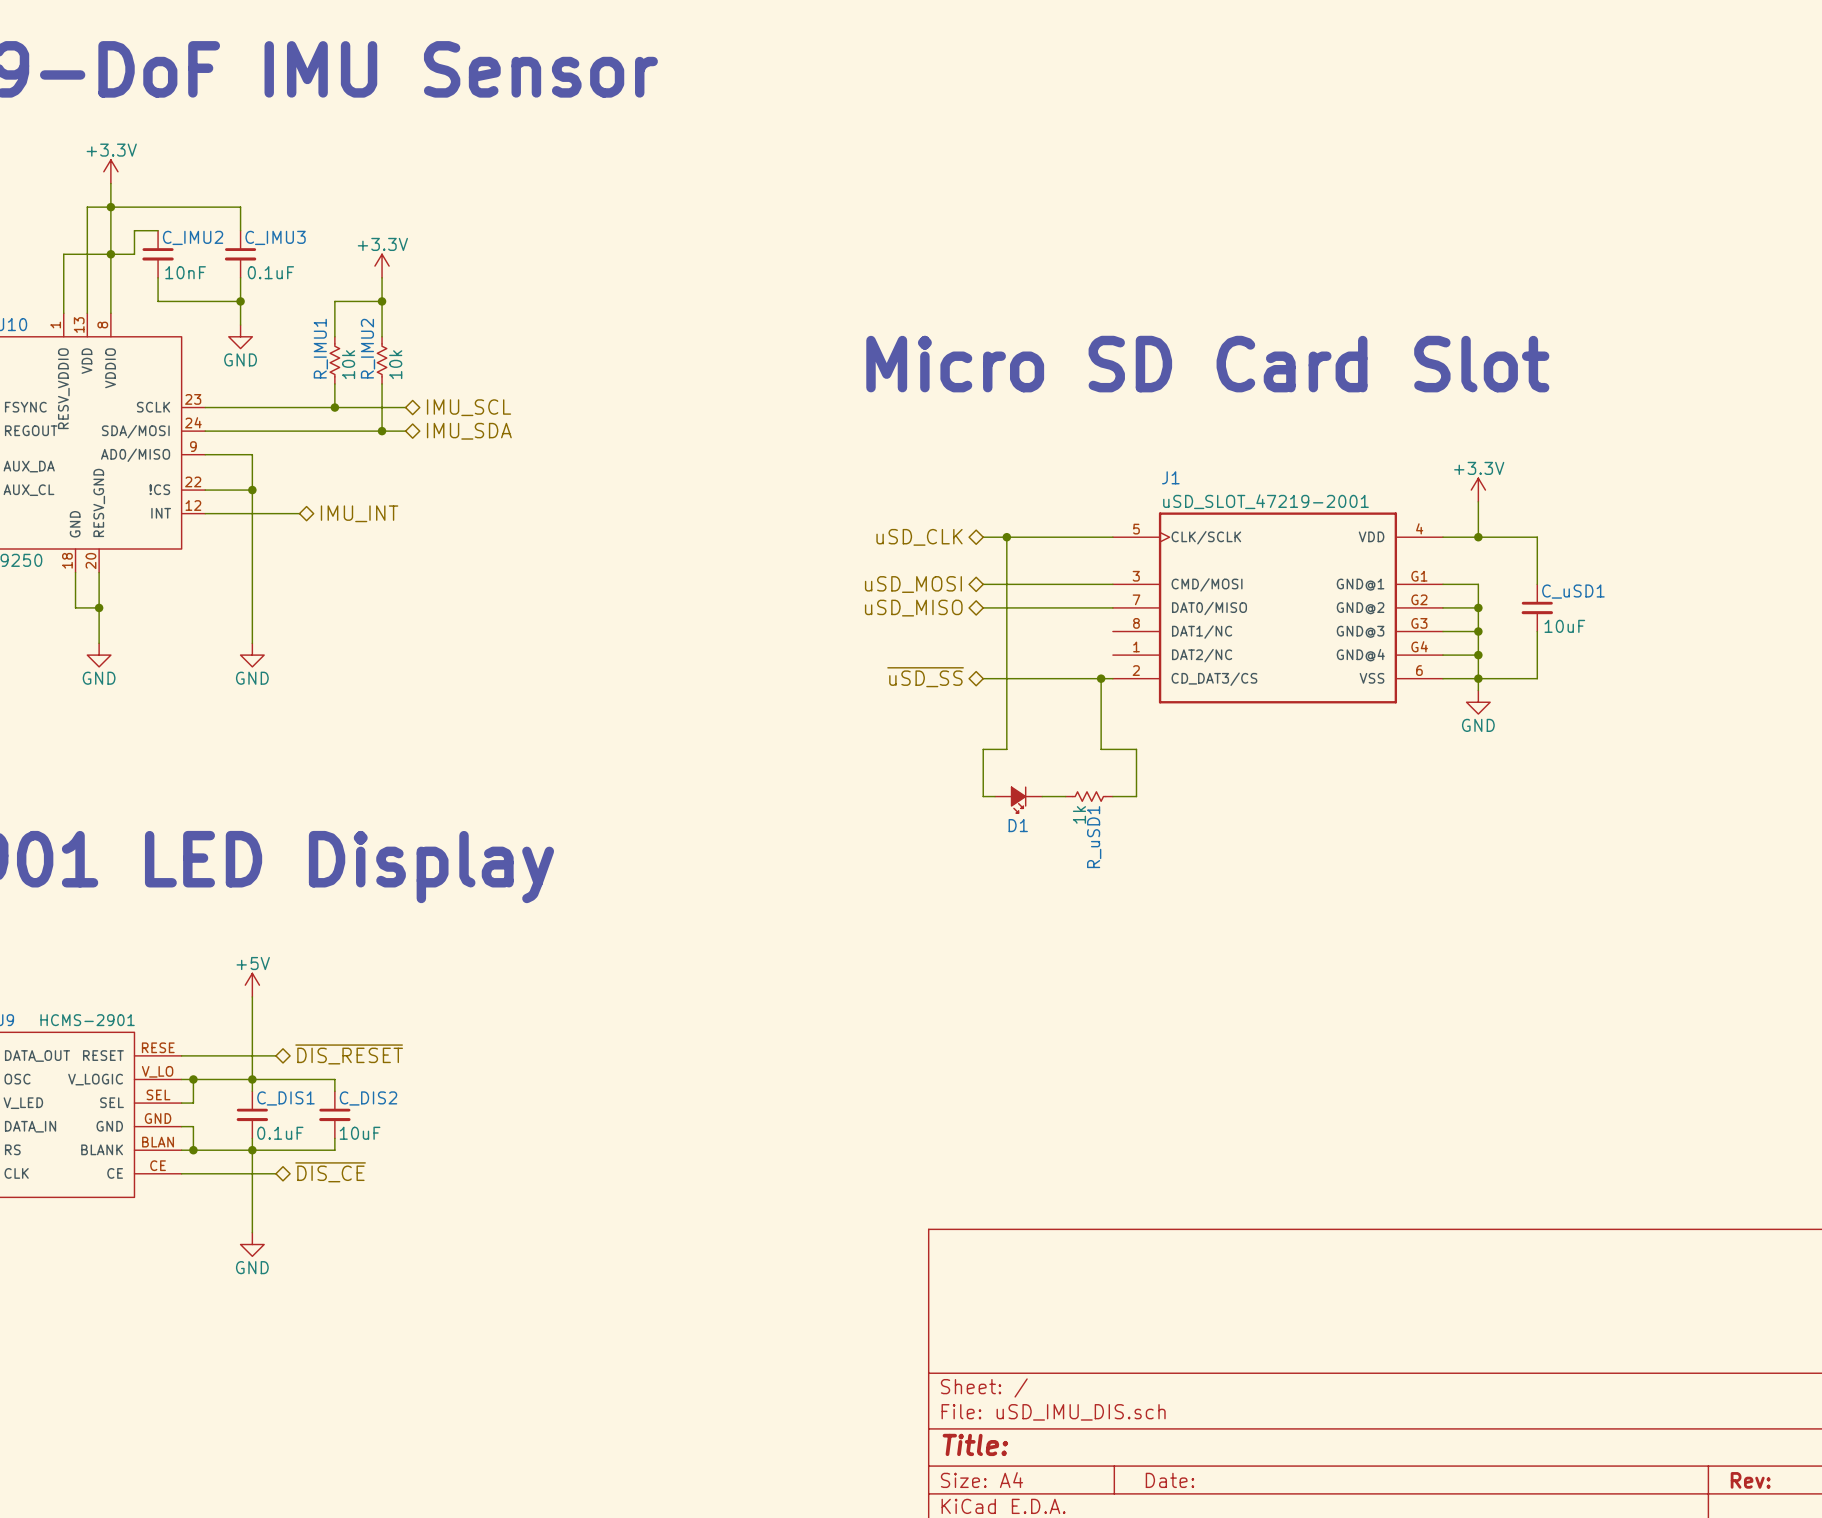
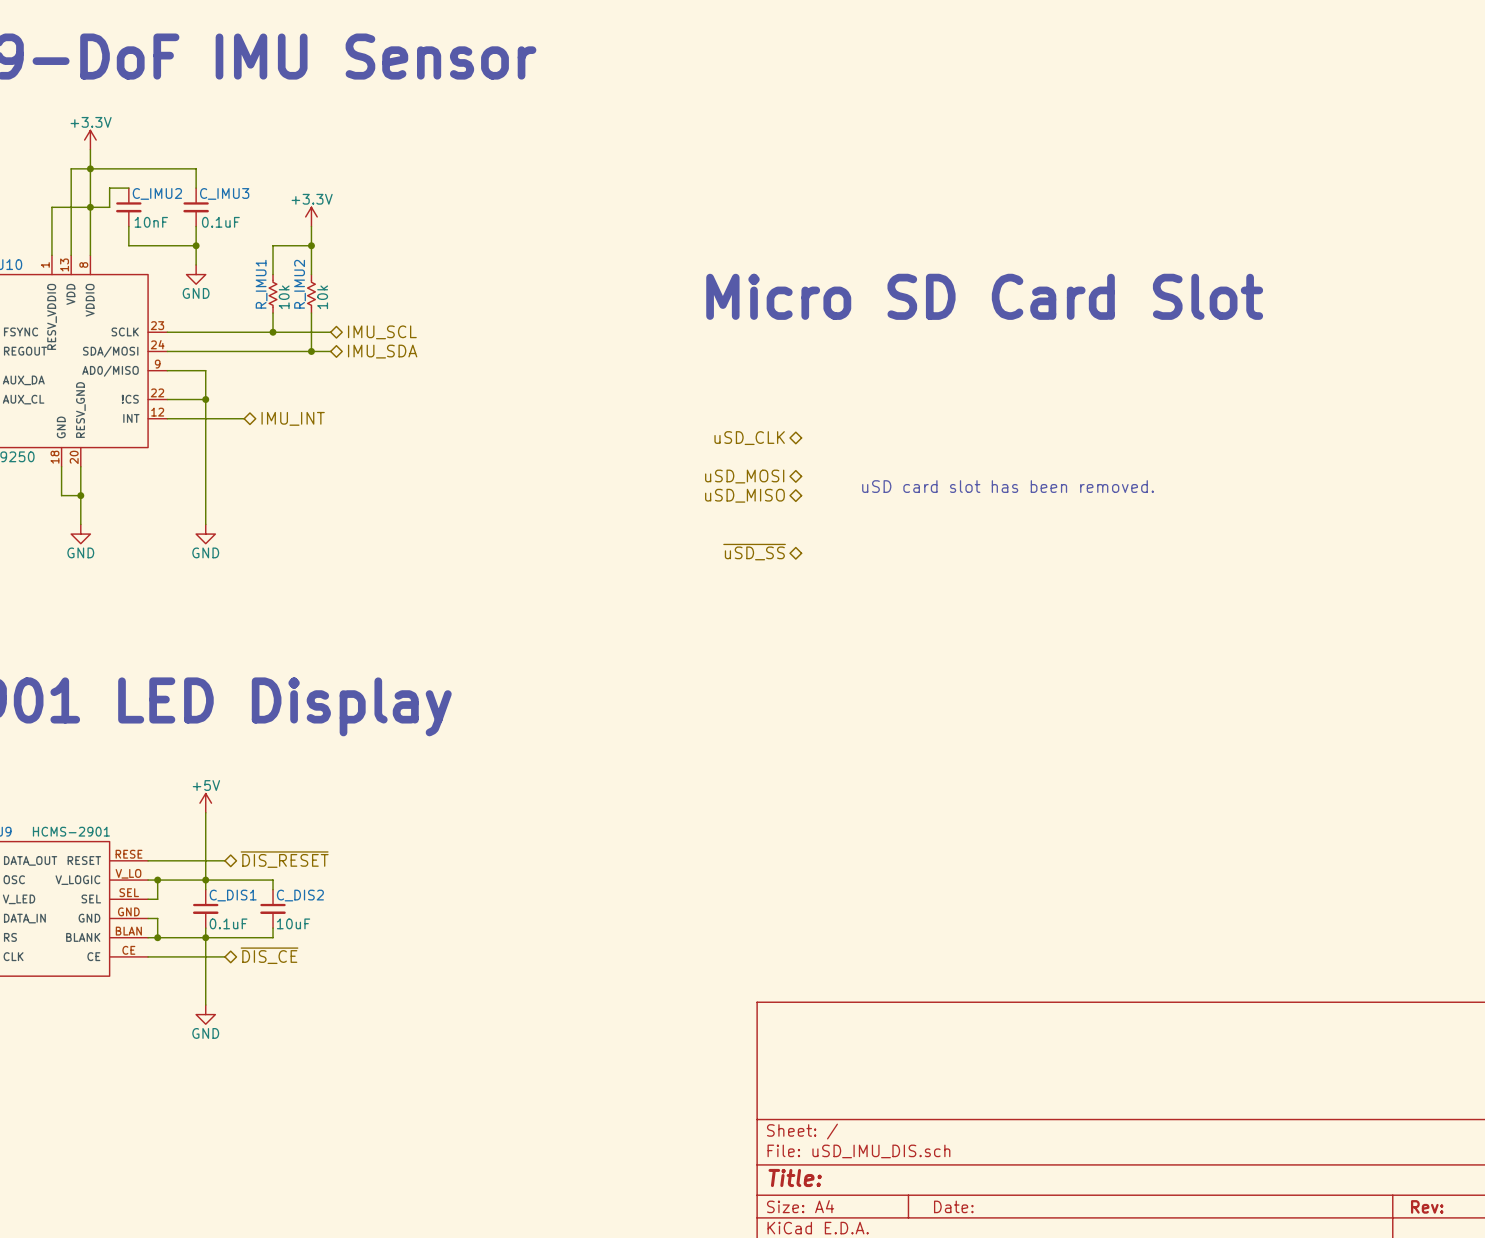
power symbol: +3.3V (1478, 490) -> none
wire: (1478, 501) (1478, 537) -> none
wire: (983, 537) (1112, 537) -> none
wire: (1006, 537) (1006, 749) (983, 749) (983, 796) (995, 796) -> none
junction: (1006, 537) -> none
wire: (1442, 537) (1537, 537) (1537, 584) -> none
junction: (1478, 537) -> none
wire: (983, 584) (1112, 584) -> none
wire: (1442, 584) (1478, 584) (1478, 690) -> none
text: none -> uSD card slot has been removed. (1008, 486)
wire: (983, 607) (1112, 607) -> none
J1: uSD_SLOT_47219-2001 (1277, 607) -> none
wire: (1442, 607) (1478, 607) -> none
junction: (1478, 607) -> none
C_uSD1: 10uF (1537, 607) -> none
wire: (1442, 631) (1478, 631) -> none
junction: (1478, 631) -> none
wire: (1537, 631) (1537, 678) (1442, 678) -> none
wire: (1442, 655) (1478, 655) -> none
junction: (1478, 655) -> none
wire: (983, 678) (1112, 678) -> none
wire: (1101, 678) (1101, 749) (1136, 749) (1136, 796) (1112, 796) -> none
junction: (1101, 678) -> none
junction: (1478, 678) -> none
power symbol: GND (1478, 702) -> none
wire: (1042, 796) (1065, 796) -> none
R_uSD1: 1k (1089, 796) -> none
D1: (1018, 800) -> none

